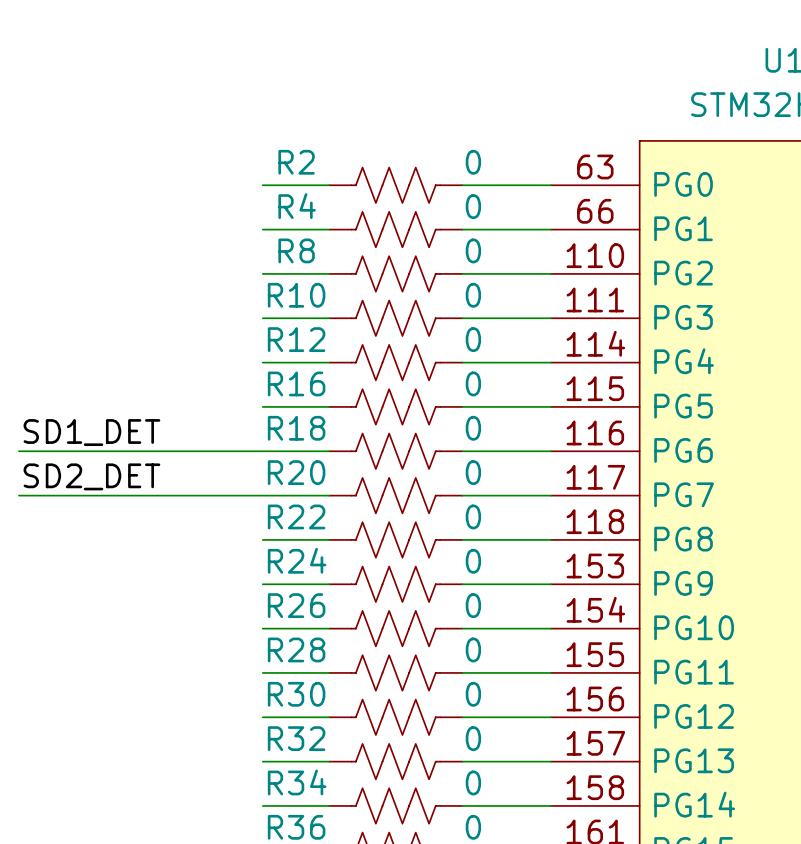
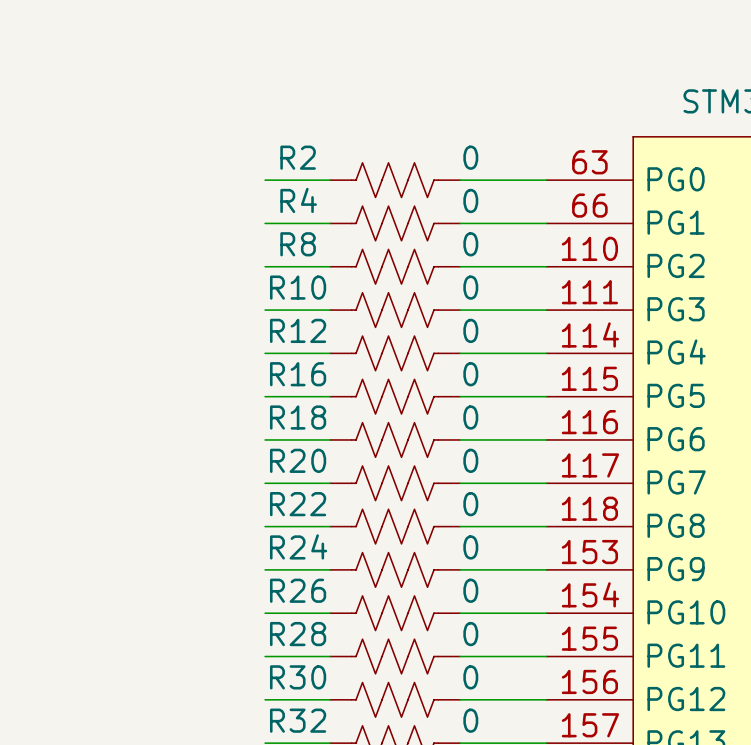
label: SD1_DET (91, 432) -> none
wire: (18, 451) (262, 451) -> none
label: SD2_DET (91, 476) -> none
wire: (18, 495) (262, 495) -> none

